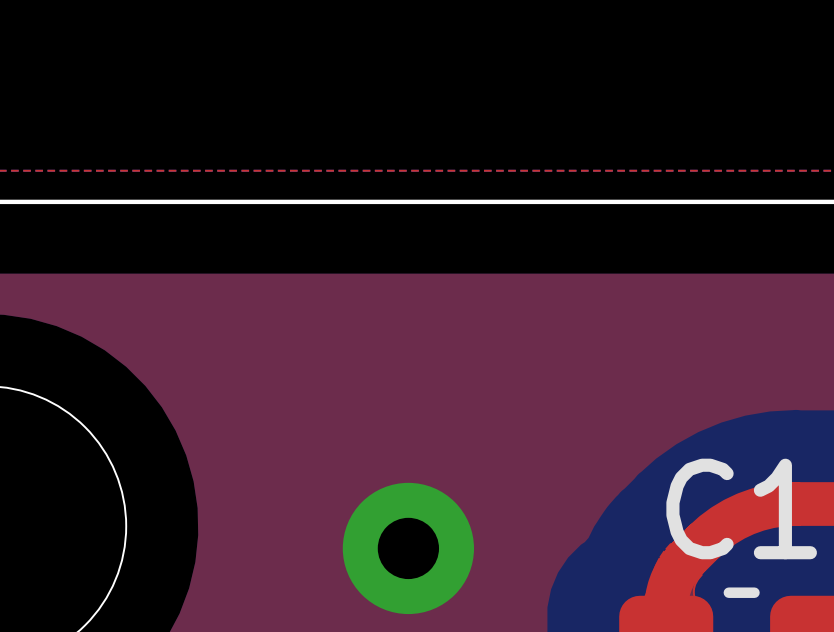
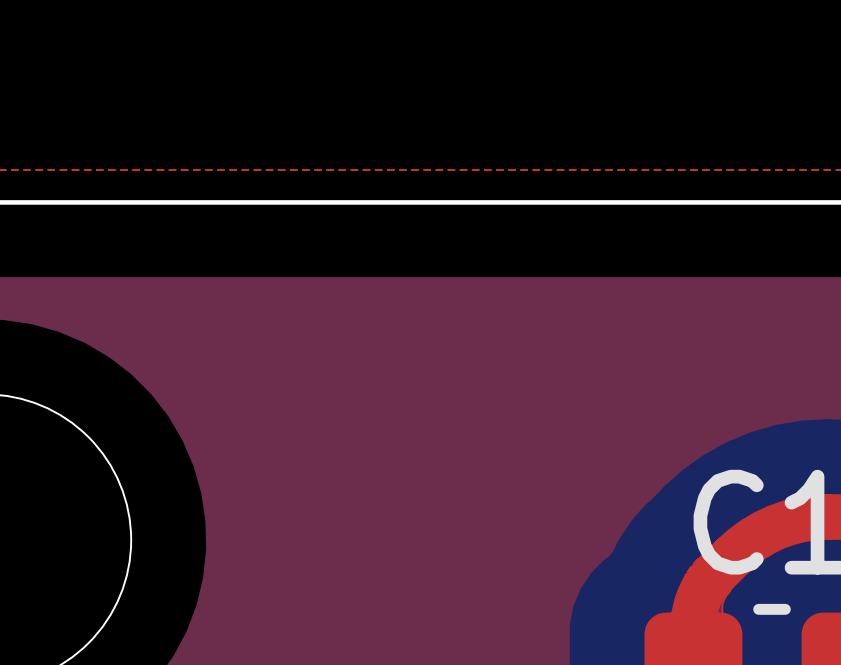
via: (408, 548) -> none

